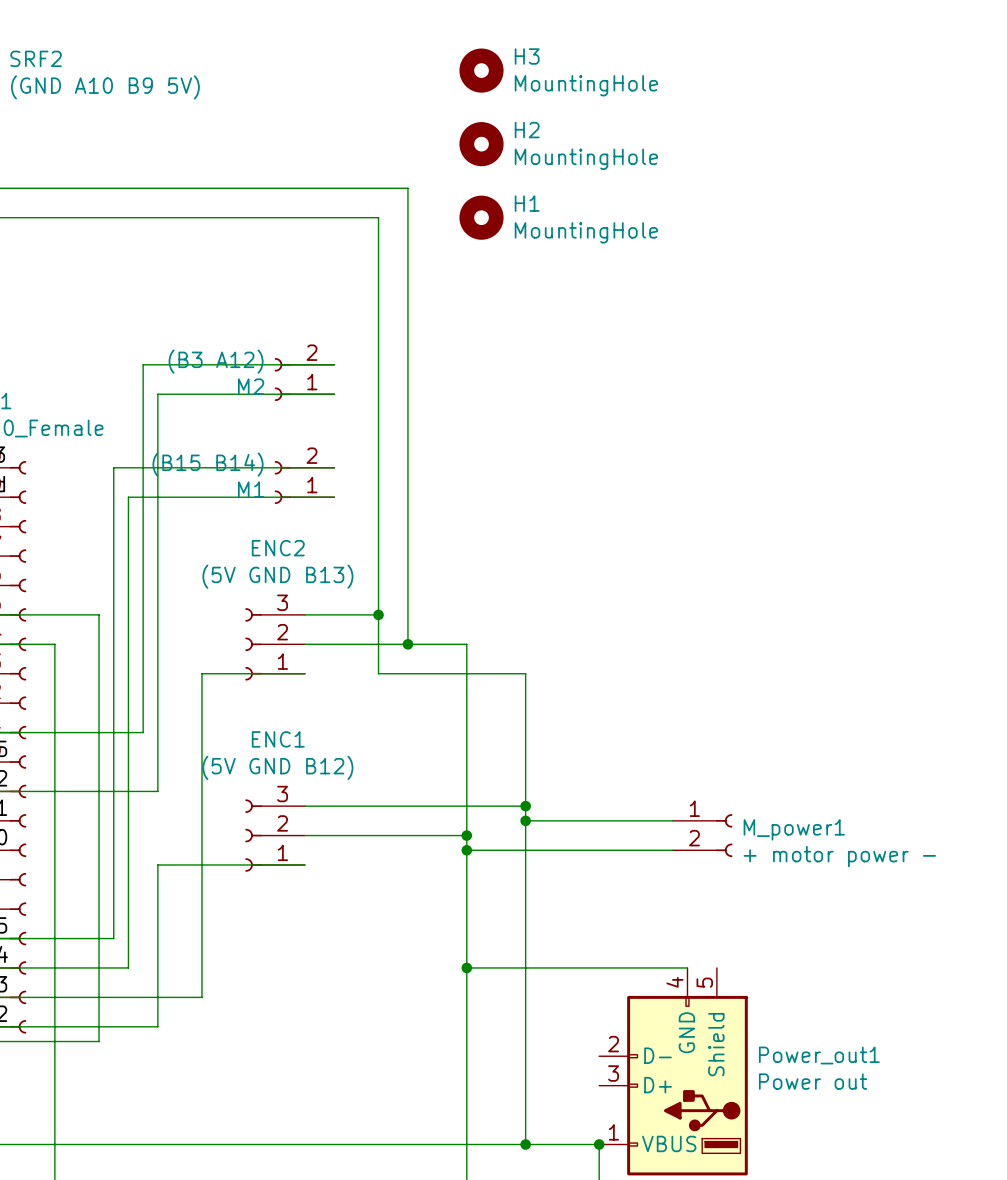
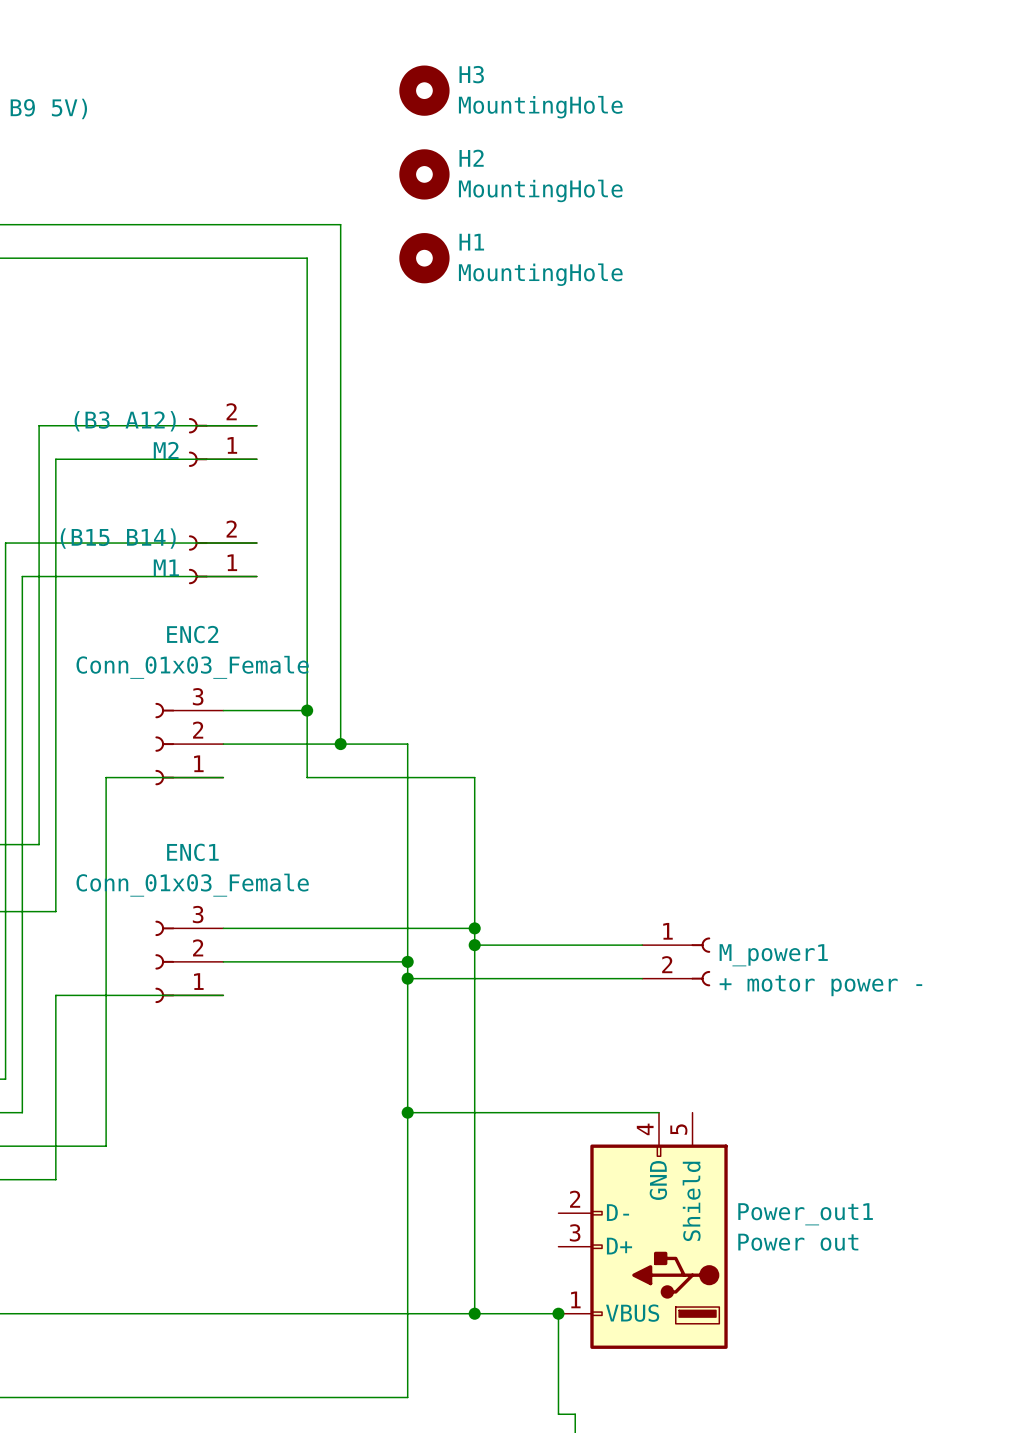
ENC2 value: (5V GND B13) (277, 576) -> Conn_01x03_Female (192, 667)
ENC1 value: (5V GND B12) (277, 767) -> Conn_01x03_Female (192, 885)

